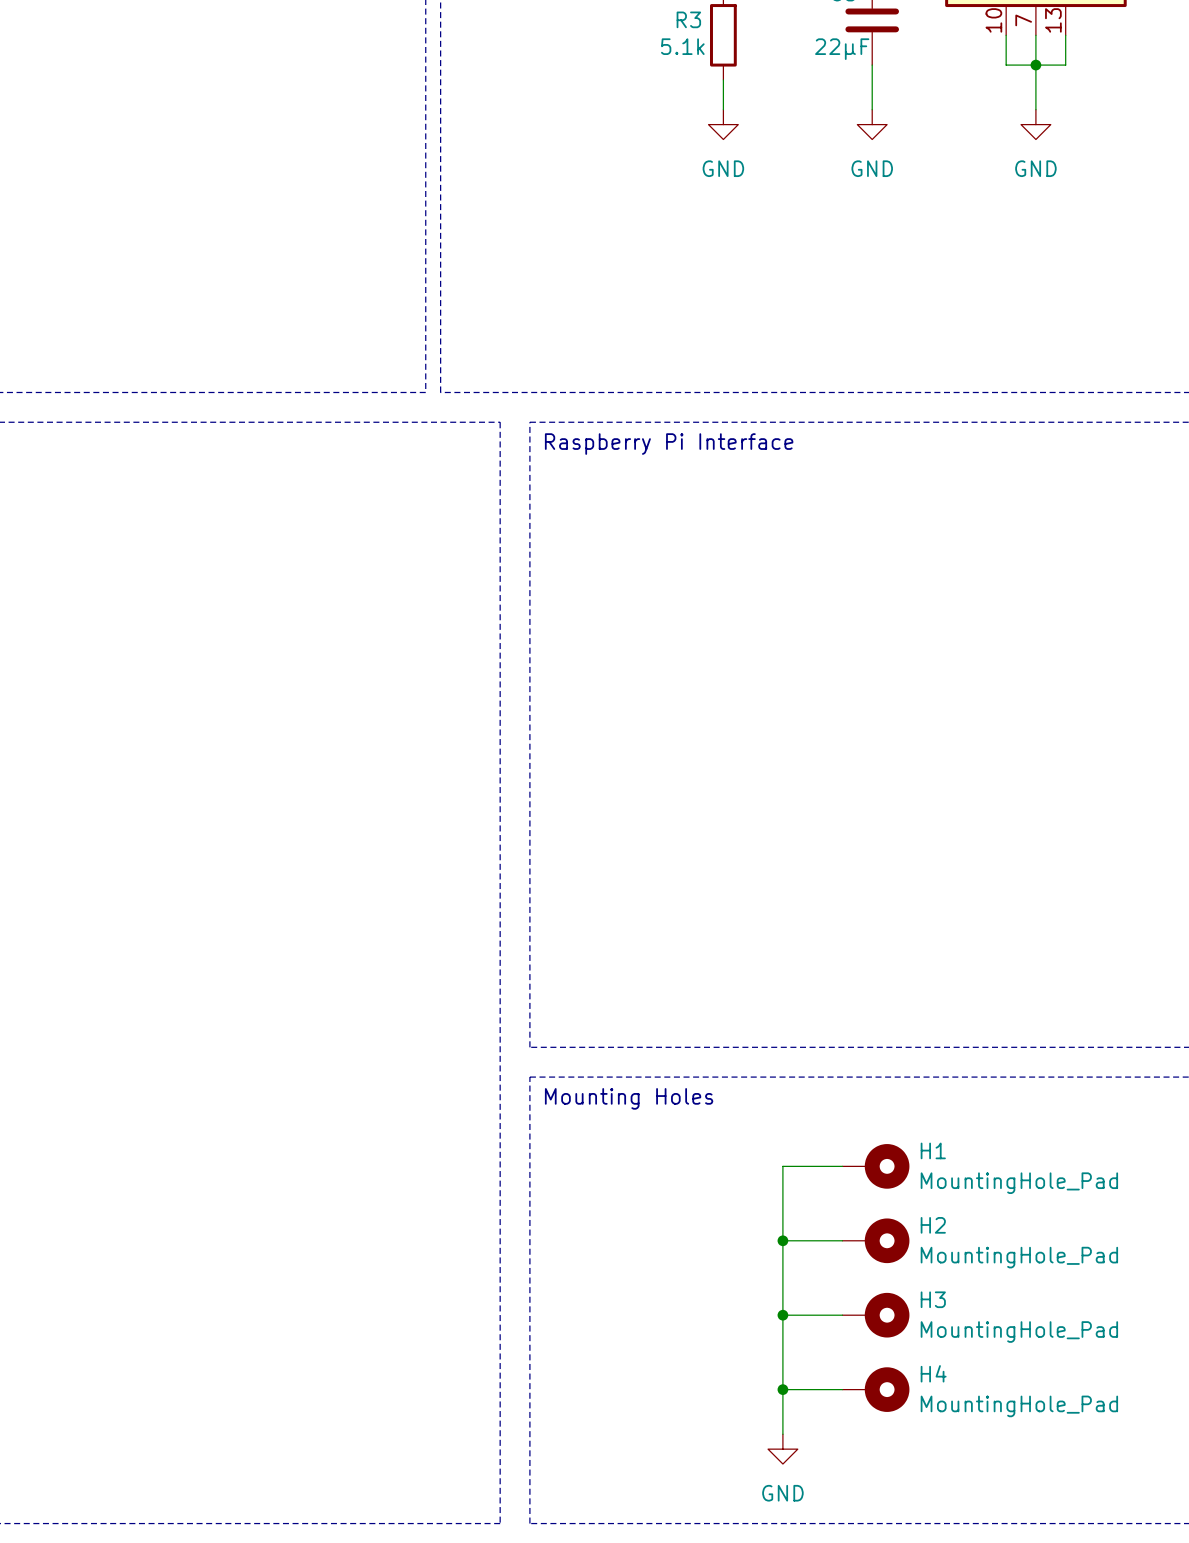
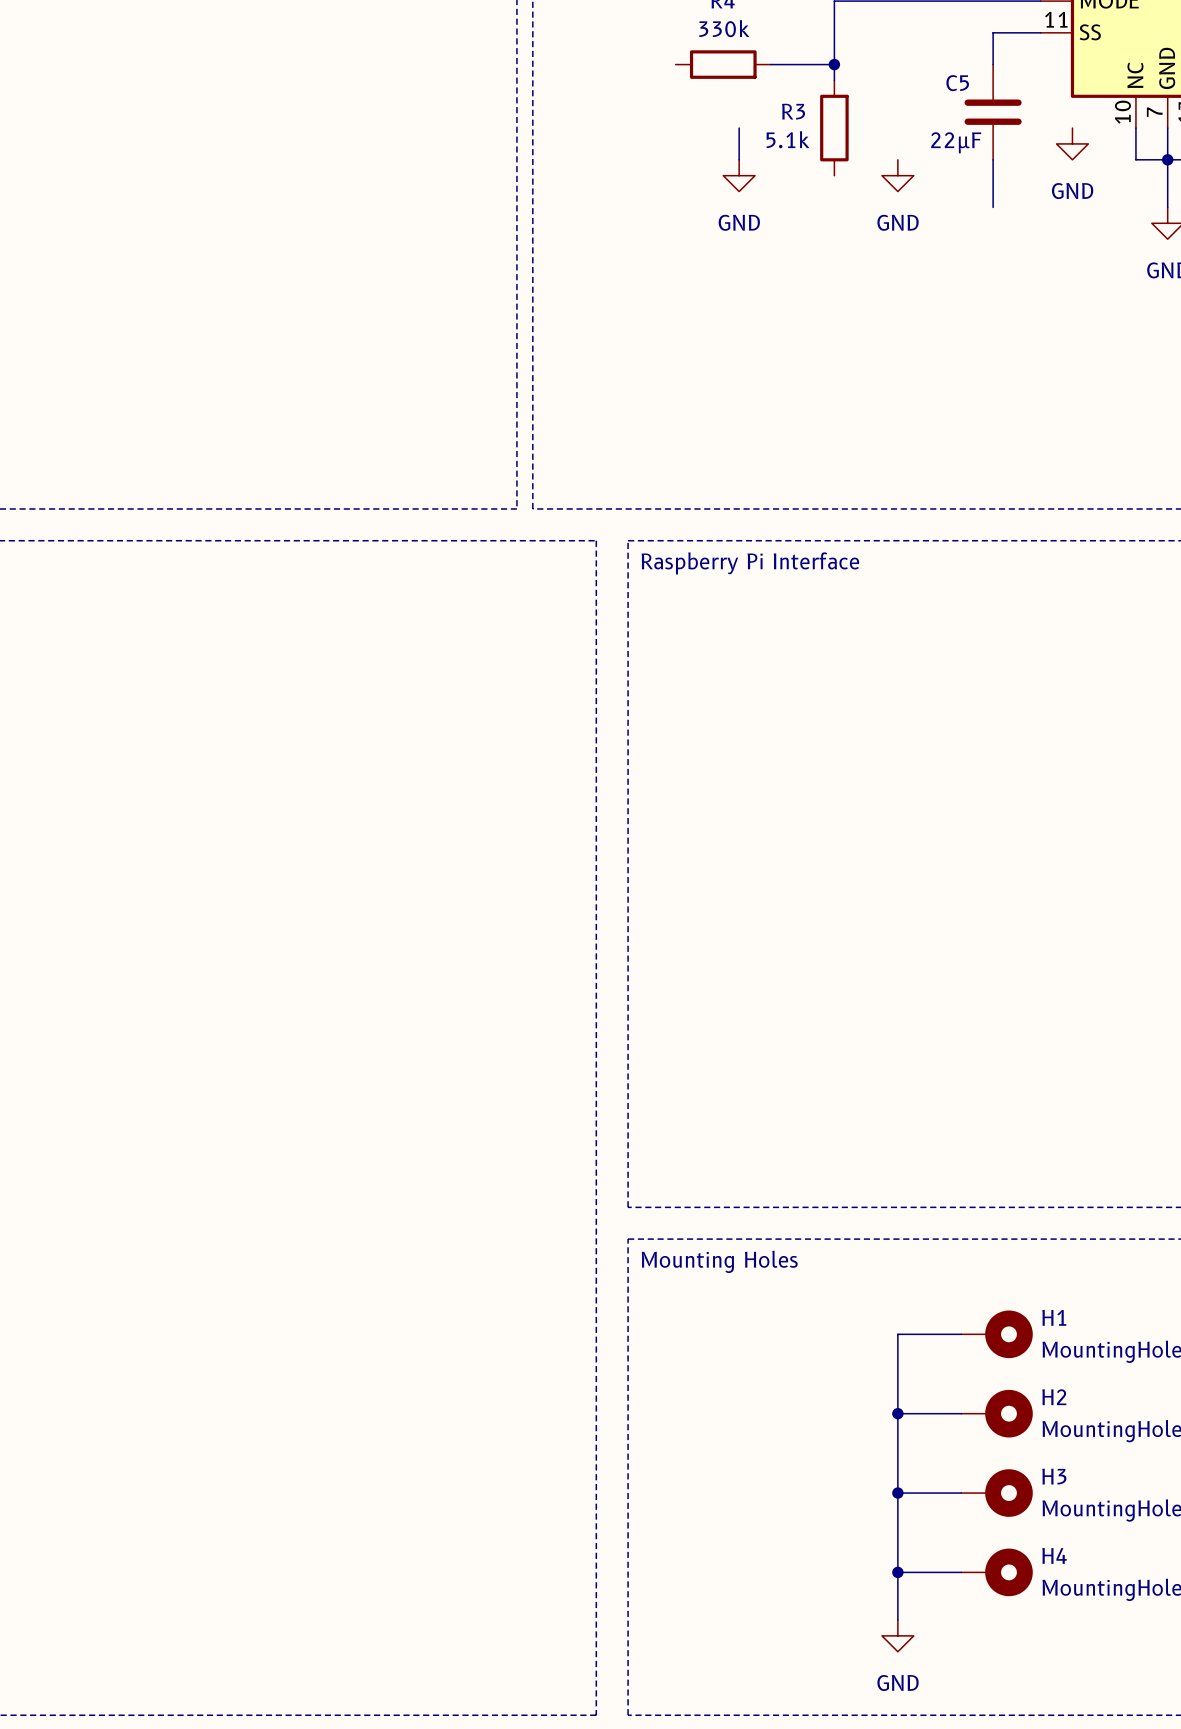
power symbol: none -> GND (1072, 143)
power symbol: none -> GND (739, 175)
wire: (723, 79) (723, 109) -> (739, 128) (739, 159)
power symbol: none -> GND (897, 175)
power symbol: GND (723, 124) -> none
power symbol: GND (872, 124) -> none

